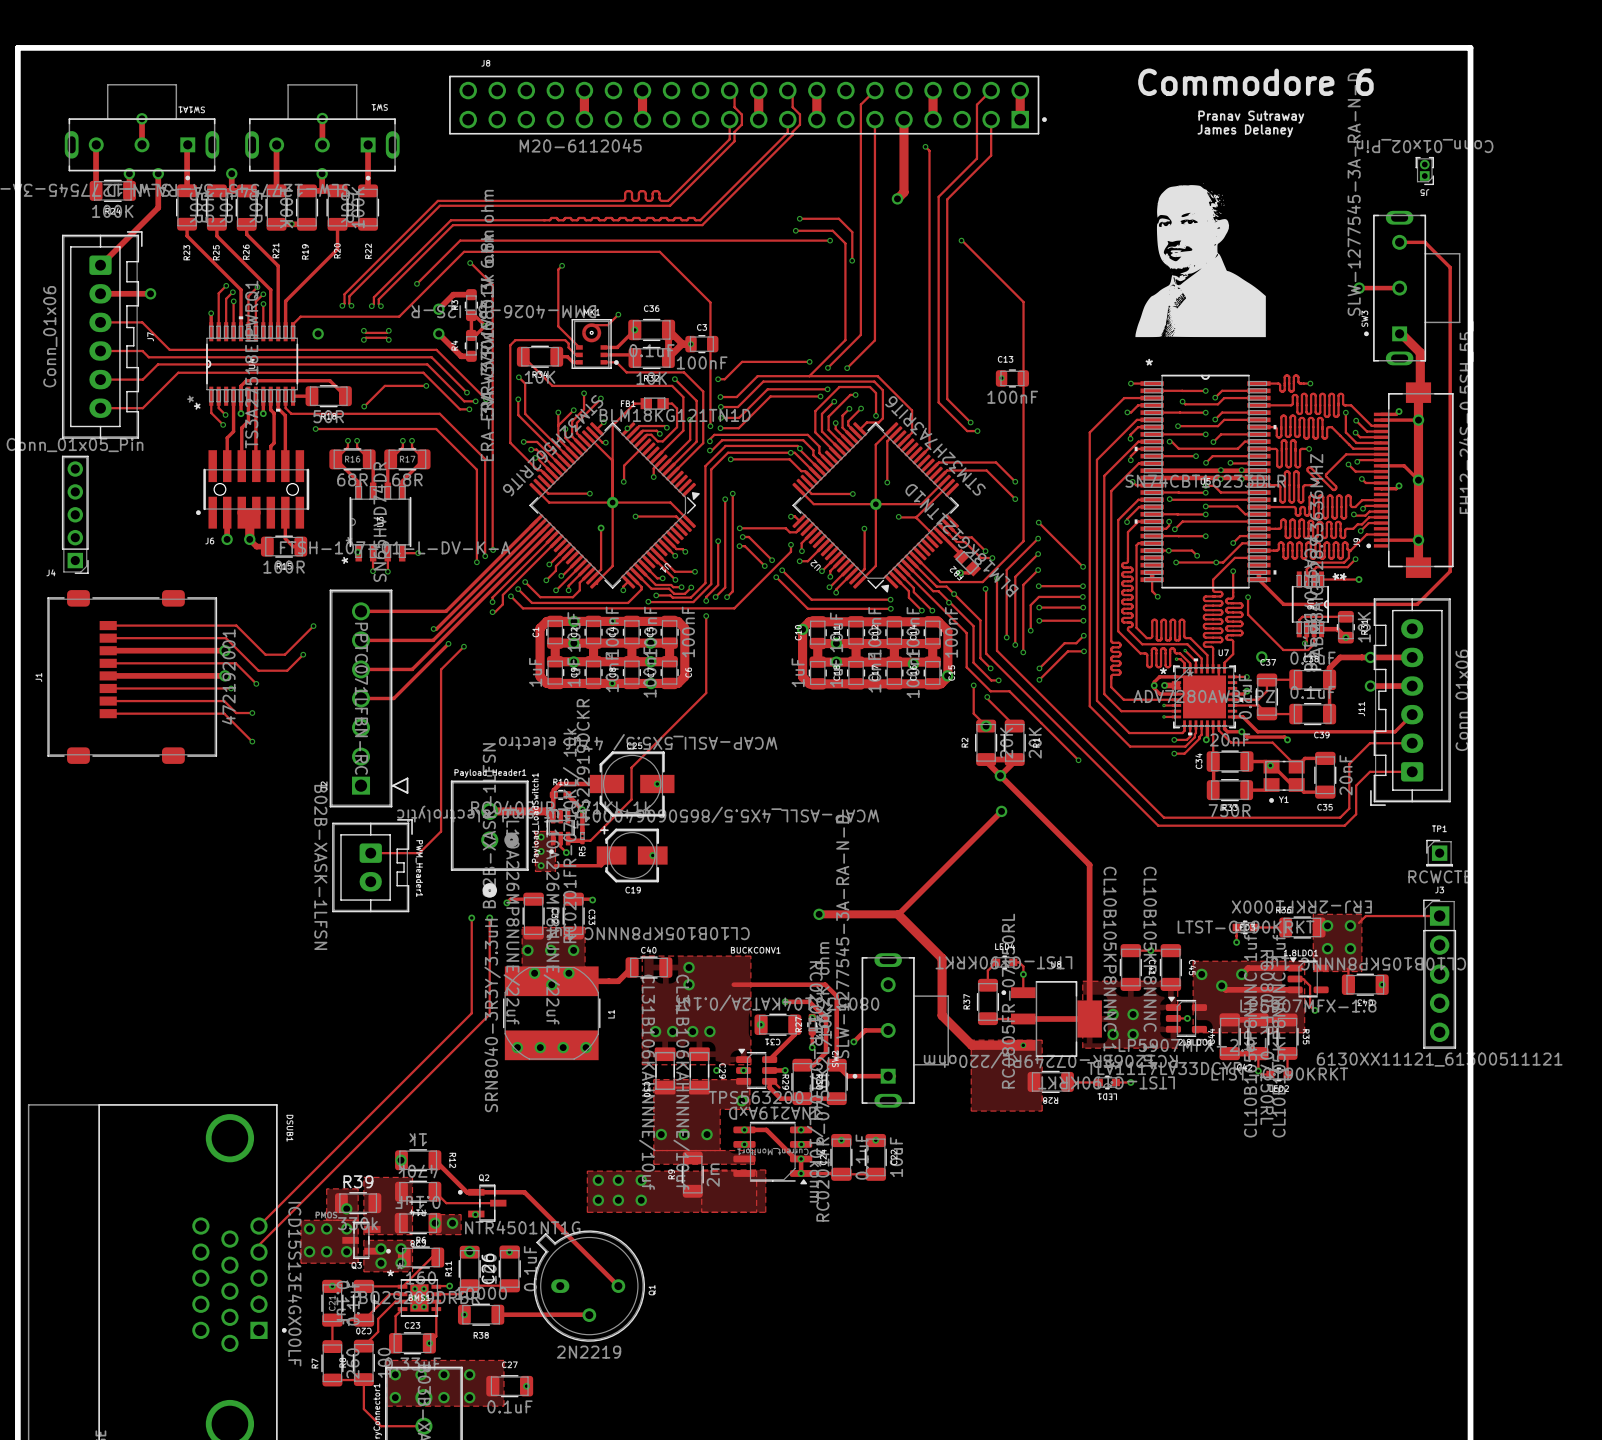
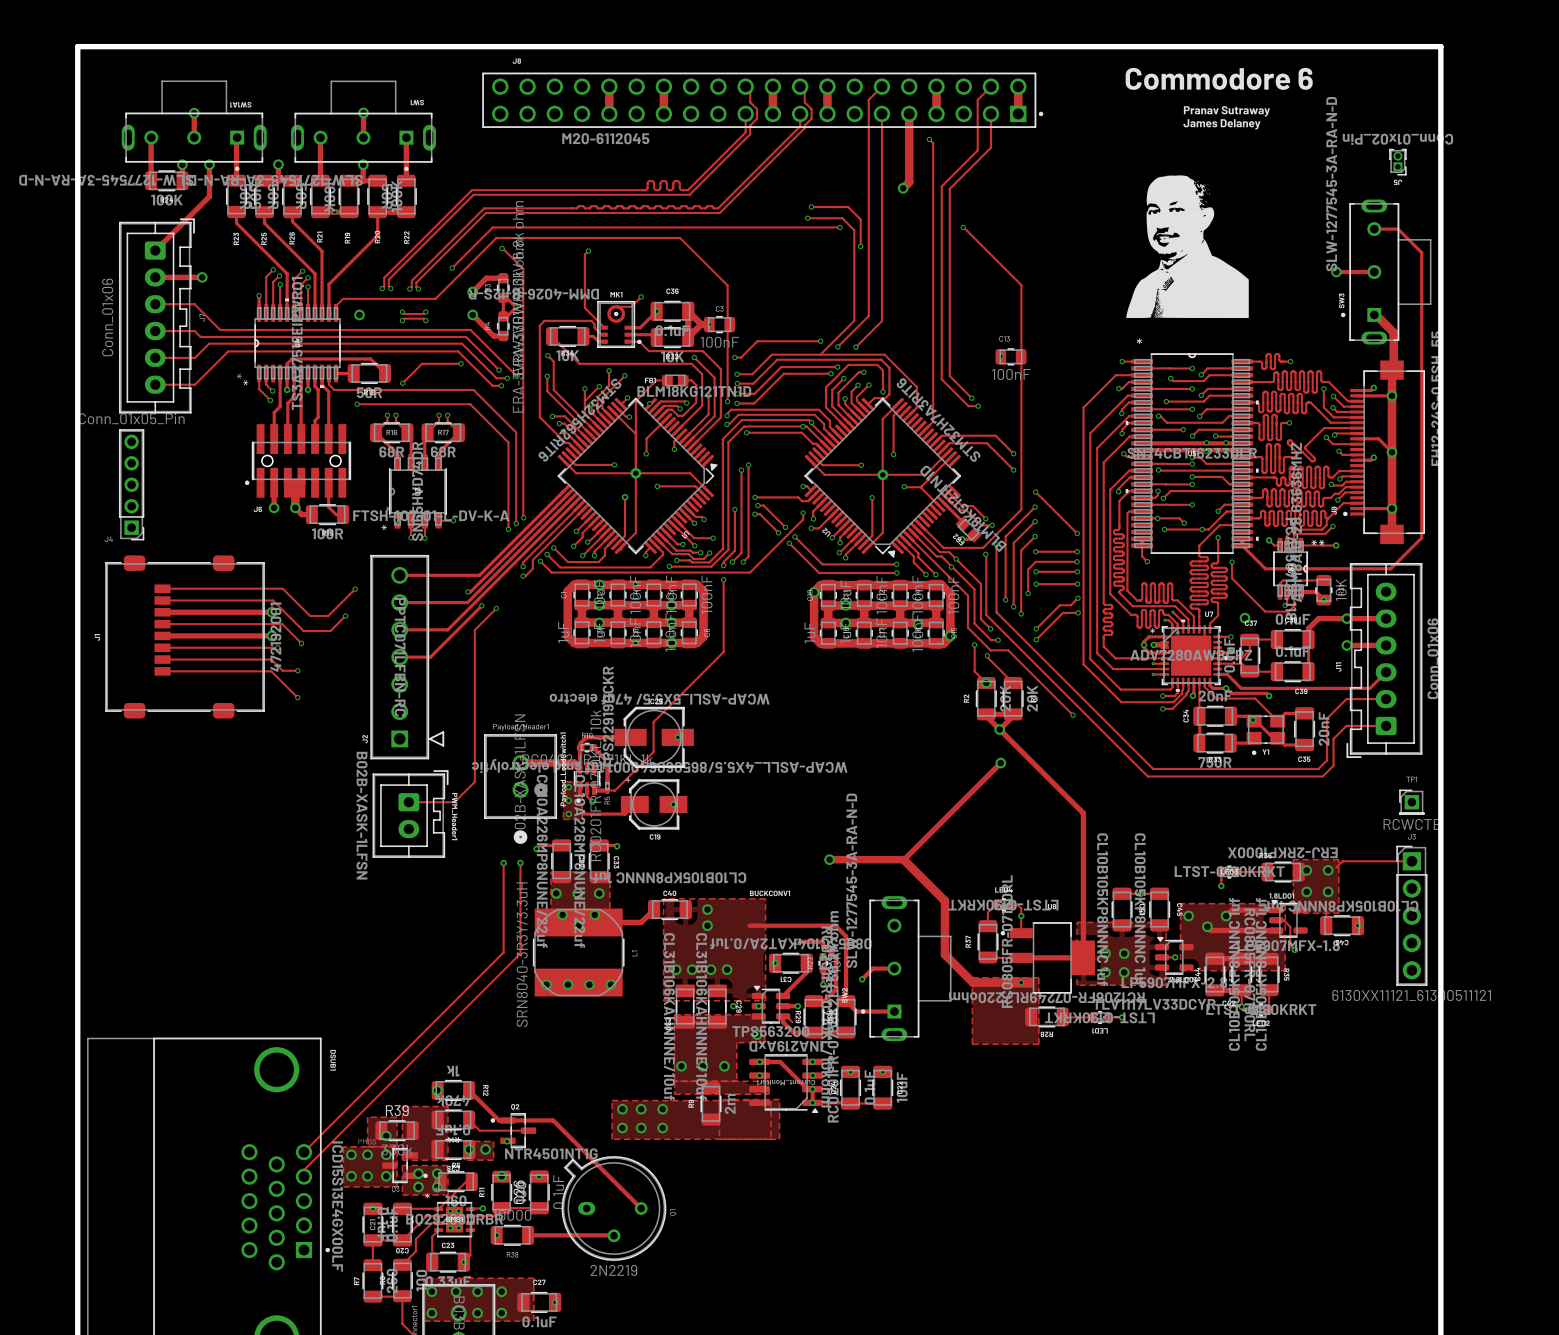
track: none -> (1269, 540) (1274, 545) (1280, 545)
via: none -> (1269, 540)

